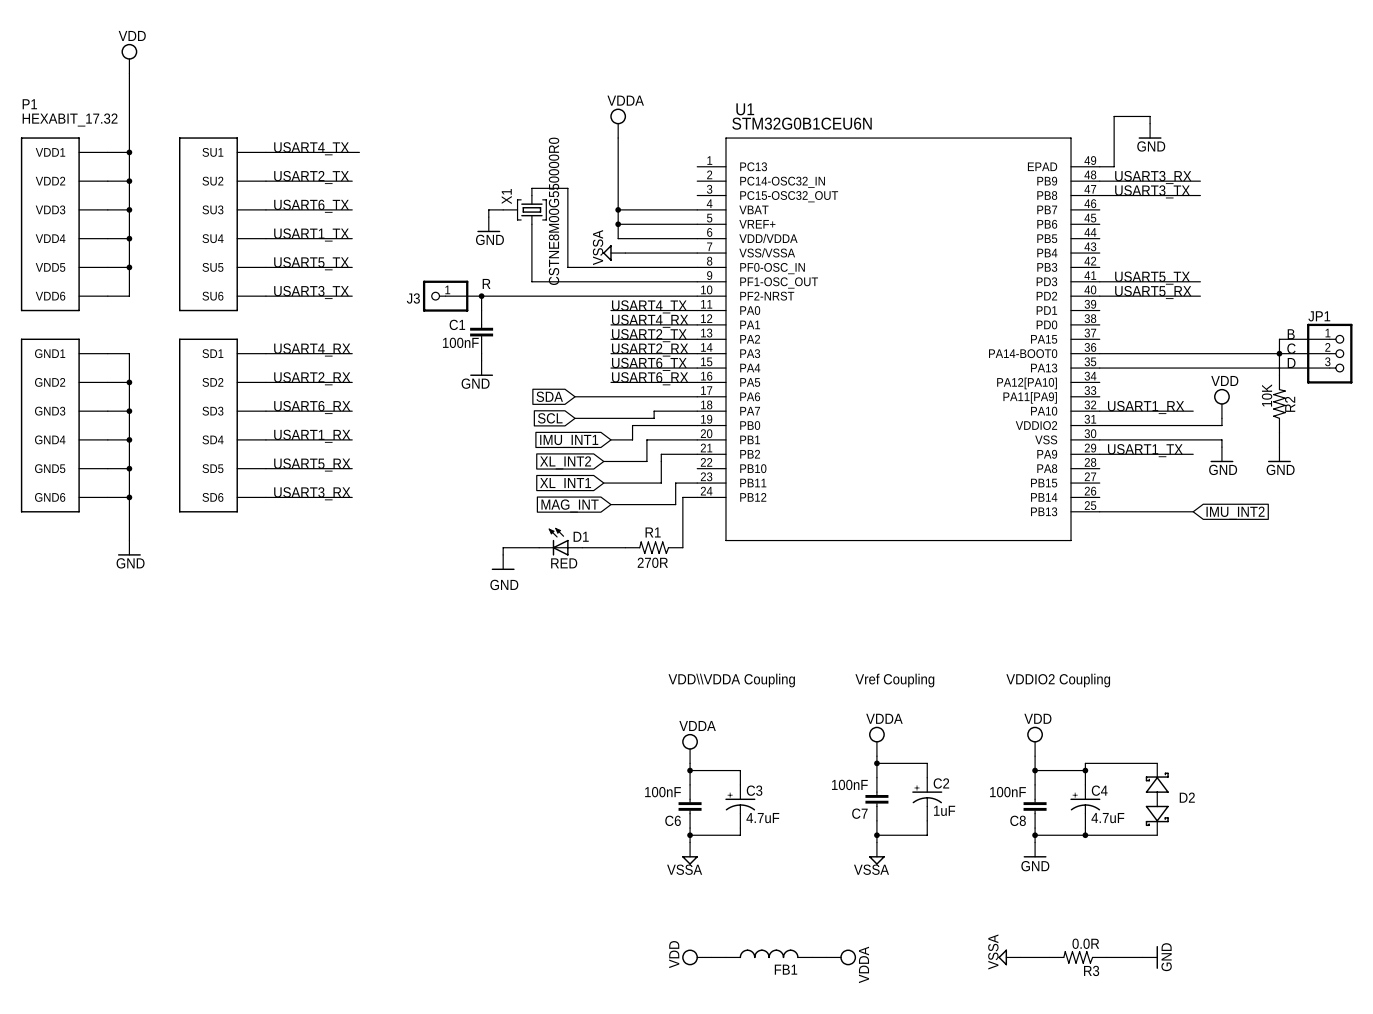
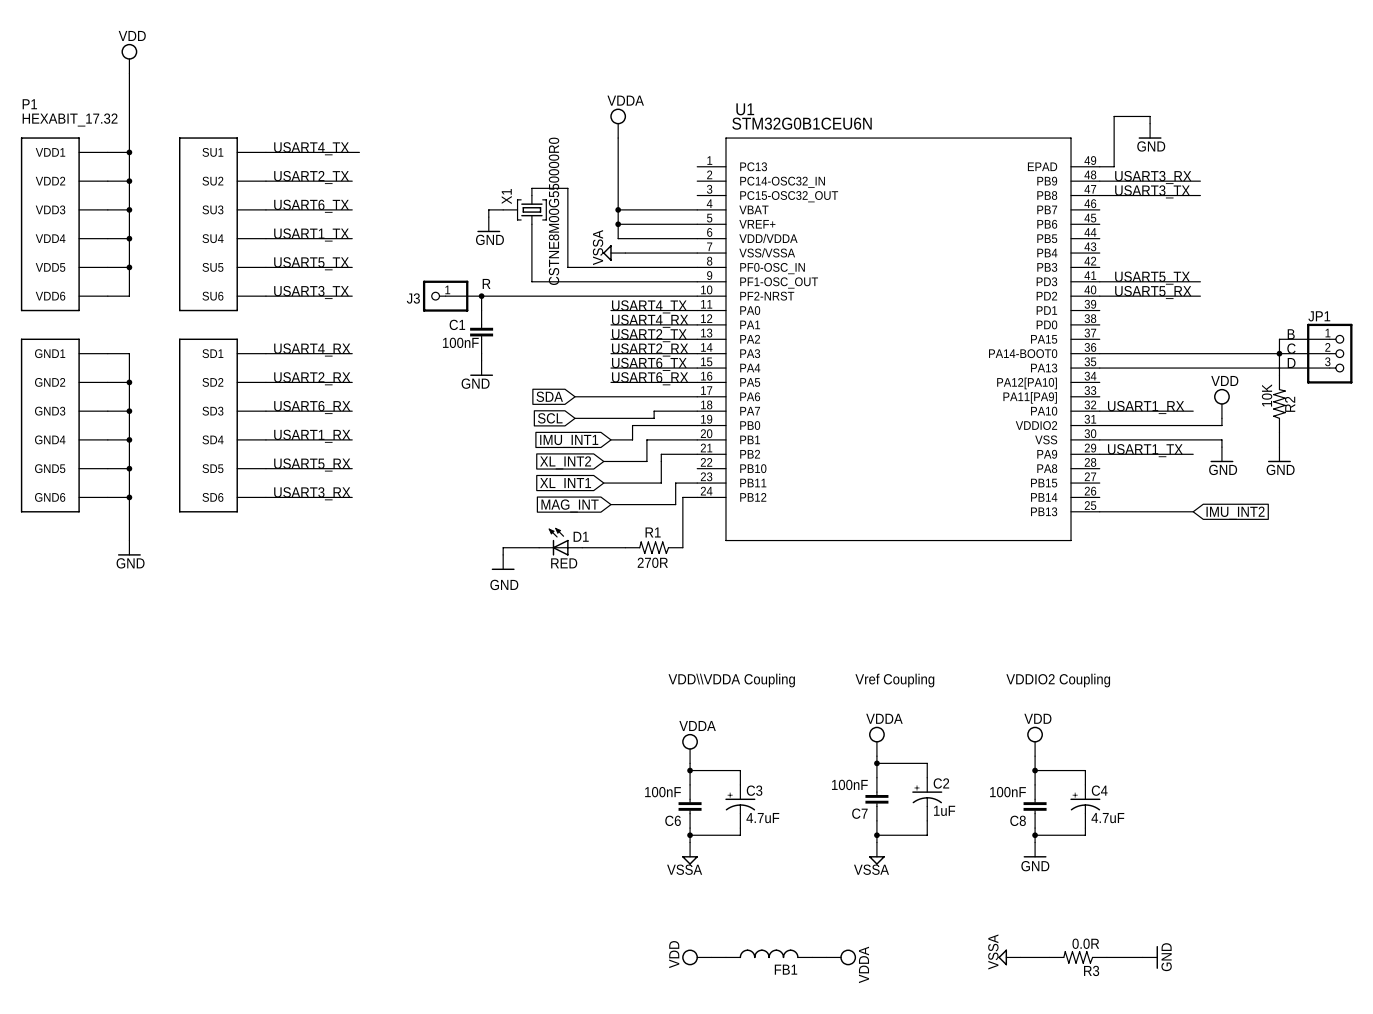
wire: (1157, 763) (1085, 763) (1085, 770) -> none
junction: (1085, 770) -> none
D2: (1157, 799) -> none
wire: (1085, 835) (1157, 835) -> none
junction: (1085, 835) -> none

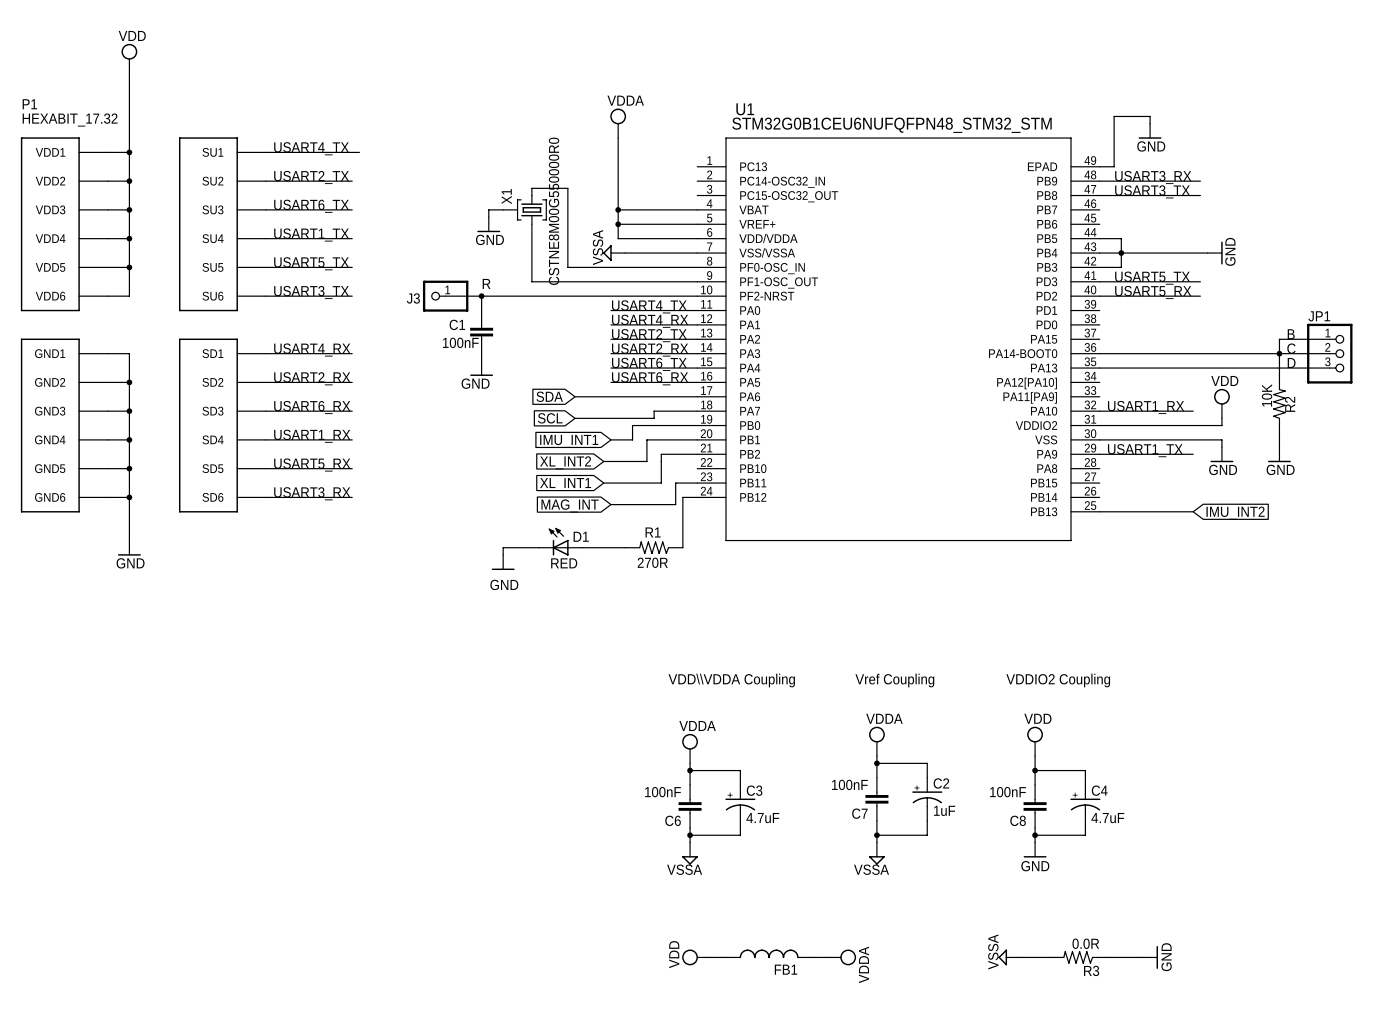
U1 value: STM32G0B1CEU6N (802, 123) -> STM32G0B1CEU6NUFQFPN48_STM32_STM (891, 125)
wire: none -> (1099, 238) (1121, 238) (1121, 267) (1099, 267)
wire: none -> (1099, 253) (1207, 253)
junction: none -> (1121, 253)
power symbol: none -> GND (1215, 253)

